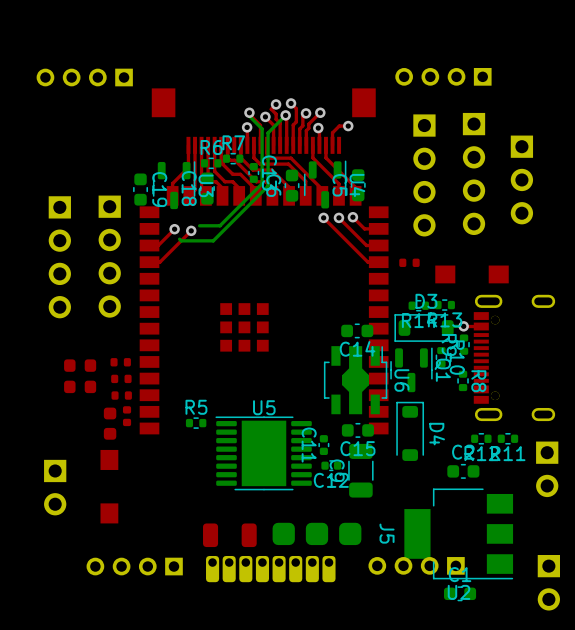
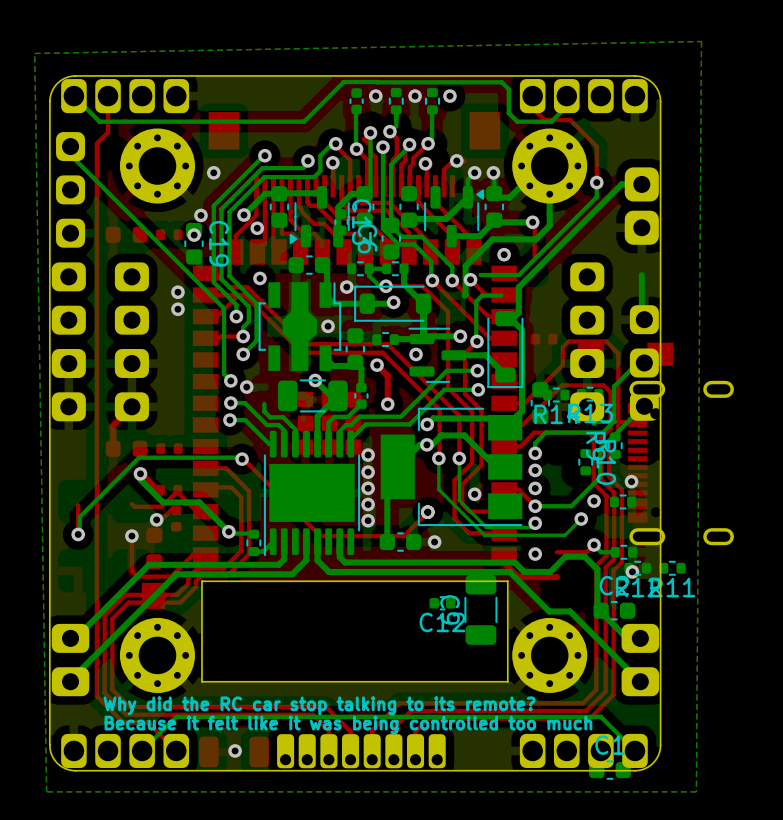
bottom zone outline: none -> (701, 41) (696, 791) (46, 791) (34, 53) (701, 41)
board edge: none -> (634, 75) (75, 75) (62, 79) (55, 85) (49, 101) (49, 745) (51, 754) (59, 765) (75, 770) (634, 770) (644, 768) (655, 760) (660, 745) (660, 101) (658, 91) (653, 83) (644, 77) (634, 75)
part footprint: [395, 67, 492, 86] -> [519, 79, 648, 114]
part footprint: [36, 68, 133, 87] -> [61, 79, 190, 114]
top track: none -> (108, 96) (108, 132) (96, 143) (96, 696) (123, 722) (147, 722) (176, 750)
via: none -> (375, 96)
via: none -> (415, 96)
via: none -> (449, 96)
top track: none -> (532, 96) (532, 108) (544, 119) (570, 119) (596, 146) (596, 182)
bottom track: none -> (566, 96) (566, 106) (551, 121) (517, 121) (508, 113) (508, 89) (501, 82) (343, 81) (304, 121) (99, 121) (73, 96)
part: none -> (356, 101)
part: none -> (396, 101)
part: none -> (432, 101)
bottom track: none -> (356, 109) (355, 143)
bottom track: none -> (432, 109) (432, 144)
bottom track: none -> (370, 138) (370, 188) (364, 194)
bottom track: (249, 112) (249, 116) (262, 128) (262, 183) (219, 225) (199, 225) -> none
bottom track: none -> (70, 146) (70, 154) (224, 308) (224, 374) (230, 380)
bottom track: none -> (333, 145) (330, 145) (320, 155) (320, 170) (314, 177) (264, 177) (229, 211) (229, 276) (256, 303) (256, 341) (243, 354)
bottom track: none -> (412, 146) (409, 146) (391, 164) (391, 226) (401, 236) (421, 236) (452, 267) (452, 276)
bottom track: (285, 115) (268, 132) (268, 186) (213, 240) (181, 240) (179, 239) -> (382, 147) (382, 228) (398, 244) (414, 244) (431, 261) (432, 276)
bottom track: none -> (264, 155) (213, 205) (213, 282) (236, 304) (236, 316)
via: none -> (264, 155)
via: none -> (307, 160)
via: none -> (456, 160)
via: (348, 126) -> none
bottom track: none -> (307, 163) (303, 168) (262, 168) (221, 209) (221, 279) (248, 306) (248, 321) (243, 327) (243, 336)
part: none -> (157, 166)
part: none -> (549, 166)
via: none -> (213, 172)
bottom track: none -> (474, 172) (467, 179) (467, 197) (446, 218) (409, 220)
via: none -> (474, 172)
bottom track: none -> (493, 172) (494, 193) (498, 197) (509, 197) (521, 185) (529, 185)
via: none -> (493, 172)
bottom track: none -> (596, 182) (596, 197) (518, 275) (480, 275)
via: none -> (596, 182)
bottom track: none -> (641, 184) (621, 184) (518, 287) (518, 312) (512, 318) (505, 318)
part: none -> (70, 189)
bottom track: none -> (364, 193) (351, 193) (338, 207) (338, 236)
bottom track: none -> (549, 194) (549, 225) (536, 239) (492, 239) (465, 266) (464, 295)
bottom track: none -> (322, 197) (318, 193) (265, 193) (243, 215)
R7: (233, 158) -> none
part: none -> (641, 206)
part: none -> (279, 206)
part: none -> (364, 206)
part: none -> (409, 206)
part: none -> (494, 206)
R6: (211, 163) -> none
via: none -> (200, 215)
via: none -> (243, 215)
part: none -> (319, 216)
part: none -> (454, 216)
top track: none -> (532, 222) (534, 224) (534, 256)
bottom track: none -> (532, 222) (496, 222) (494, 220) (479, 236) (451, 236)
via: none -> (532, 222)
part: (474, 173) -> none
part: (424, 175) -> none
via: none -> (257, 228)
part: (521, 179) -> none
part: none -> (126, 234)
part: none -> (169, 234)
via: none -> (194, 235)
U4: (325, 184) -> none
U3: (174, 185) -> none
C5: (358, 185) -> none
C18: (207, 188) -> none
via: none -> (504, 254)
part: none -> (309, 265)
bottom track: none -> (322, 265) (327, 269) (327, 293) (325, 295) (334, 303) (393, 302)
part: none -> (360, 268)
bottom track: none -> (386, 268) (369, 268) (369, 275) (379, 286) (386, 286)
part: none -> (395, 268)
bottom track: none -> (404, 268) (404, 284) (423, 303) (423, 337) (394, 339)
top track: none -> (205, 273) (215, 273) (229, 287) (247, 287) (304, 344) (387, 344) (459, 415) (459, 458)
bottom track: none -> (641, 275) (641, 315) (638, 318)
via: none -> (259, 278)
via: none -> (346, 287)
top track: none -> (386, 286) (422, 286) (448, 311) (448, 387) (472, 412) (472, 463) (454, 480) (454, 518) (469, 533) (504, 533)
via: none -> (386, 286)
via: none -> (177, 292)
top track: none -> (205, 294) (244, 294) (302, 352) (382, 352) (439, 409) (438, 458)
via: (174, 229) -> none
bottom track: none -> (501, 295) (482, 295) (476, 301) (477, 341)
top track: (191, 230) (161, 260) -> (243, 336) (221, 336)
via: (191, 230) -> none
via: none -> (393, 302)
part: none -> (392, 303)
via: none -> (177, 309)
via: none -> (236, 316)
bottom track: none -> (510, 318) (522, 330) (522, 410) (505, 427) (495, 418) (433, 418) (427, 424)
via: none -> (328, 326)
part: none -> (299, 326)
part: (109, 256) -> none
part: (59, 257) -> none
via: none -> (243, 336)
bottom track: none -> (460, 336) (423, 336)
via: none -> (460, 336)
part: none -> (385, 339)
part: none -> (68, 341)
part: none -> (131, 341)
top track: none -> (477, 341) (465, 353) (465, 394) (481, 410) (481, 465) (462, 484) (462, 504) (469, 511) (504, 511)
via: none -> (477, 341)
part: none -> (587, 341)
part: none -> (355, 349)
part: none -> (505, 349)
via: none -> (243, 354)
via: none -> (416, 354)
part: none -> (437, 355)
bottom track: none -> (454, 355) (485, 355) (505, 374)
bottom track: none -> (325, 358) (333, 365) (351, 365) (355, 362) (361, 368) (361, 387)
bottom track: none -> (638, 362) (614, 386) (614, 421) (602, 432) (545, 432) (535, 443) (535, 453)
part: none -> (644, 362)
top track: none -> (377, 365) (387, 375) (387, 404)
via: none -> (377, 365)
bottom track: none -> (477, 370) (446, 370) (401, 416) (359, 416) (351, 425) (346, 425) (339, 431) (339, 444)
via: none -> (477, 370)
via: none -> (230, 380)
bottom track: none -> (315, 380) (330, 395) (338, 395) (317, 416) (317, 444)
via: none -> (315, 380)
via: none -> (246, 387)
bottom track: none -> (478, 389) (444, 389) (409, 424) (365, 424) (350, 439) (350, 444)
via: none -> (478, 389)
part: none -> (312, 395)
part: none -> (361, 395)
bottom track: none -> (230, 403) (244, 403) (267, 425) (278, 425) (284, 430) (284, 444)
via: none -> (230, 403)
part: none -> (540, 403)
bottom track: none -> (264, 404) (264, 411) (270, 417) (283, 417) (295, 429) (295, 444)
bottom track: none -> (361, 404) (348, 416) (334, 416) (328, 422) (328, 444)
via: none -> (387, 404)
top track: none -> (504, 403) (524, 403) (562, 365) (562, 347) (568, 341) (606, 341) (618, 353) (618, 432) (609, 441) (609, 476) (621, 489) (621, 562) (613, 570) (613, 694) (589, 718) (428, 718) (415, 731) (415, 759)
bottom track: none -> (638, 405) (638, 411) (600, 449) (600, 477) (571, 506) (535, 506)
top track: none -> (131, 406) (113, 425) (113, 448)
bottom track: none -> (229, 420) (245, 420) (269, 444) (273, 444)
via: none -> (229, 420)
via: (463, 326) -> none
via: none -> (427, 424)
D3: (424, 328) -> none
C14: (357, 330) -> none
top track: none -> (505, 426) (504, 424) (522, 424) (562, 385) (603, 385) (610, 392) (610, 428) (601, 437) (601, 480) (614, 492) (614, 558) (605, 567) (605, 691) (586, 710) (411, 710) (393, 728) (393, 759)
via: none -> (426, 444)
top track: none -> (504, 446) (520, 446) (534, 432) (588, 432) (593, 437) (593, 483) (606, 495) (606, 555) (596, 565) (596, 689) (582, 703) (399, 703) (372, 730) (372, 759)
part: none -> (126, 448)
via: none -> (535, 453)
via: none -> (368, 455)
top track: none -> (242, 459) (320, 536) (403, 536) (427, 512)
bottom track: none -> (242, 459) (139, 457) (79, 517) (78, 534)
via: none -> (242, 459)
via: none -> (438, 458)
bottom track: none -> (459, 458) (459, 500) (486, 527) (530, 527) (535, 523)
via: none -> (459, 458)
bottom track: none -> (442, 459) (438, 463) (438, 489) (484, 535) (565, 535) (581, 519)
part: none -> (451, 466)
bottom track: none -> (505, 466) (495, 466) (464, 435) (441, 435) (432, 444) (419, 444) (387, 477) (387, 542)
top track: none -> (205, 468) (226, 468) (248, 491) (248, 554) (226, 576) (200, 576) (195, 581) (195, 587) (180, 602) (128, 602) (112, 618) (112, 689) (129, 706) (326, 706) (350, 731) (350, 759)
part position: (120, 362) -> (169, 448)
via: none -> (535, 470)
via: none -> (368, 472)
part: (80, 365) -> none
top track: none -> (140, 473) (159, 491)
bottom track: none -> (140, 473) (140, 479) (163, 502) (199, 502) (230, 533) (253, 534)
via: none -> (140, 473)
Q1: (411, 369) -> none
via: none -> (631, 481)
via: none -> (368, 488)
via: none -> (535, 488)
top track: none -> (205, 489) (208, 487) (231, 487) (241, 497) (241, 550) (223, 568) (197, 568) (188, 577) (188, 583) (177, 594) (125, 594) (104, 615) (104, 692) (126, 714) (312, 714) (328, 730) (328, 759)
top track: none -> (504, 489) (518, 489) (535, 506)
U6: (355, 380) -> none
R8: (463, 380) -> none
part: none -> (312, 493)
via: none -> (474, 494)
part: (80, 386) -> none
via: none -> (594, 501)
part: none -> (623, 501)
top track: none -> (131, 504) (134, 506) (161, 506) (176, 491) (196, 511) (205, 511)
via: none -> (368, 504)
top track: none -> (78, 505) (78, 534)
part footprint: [111, 391, 132, 400] -> [170, 505, 182, 532]
via: none -> (535, 506)
top track: none -> (176, 510) (170, 510) (161, 519) (156, 519)
via: none -> (427, 512)
via: none -> (581, 519)
via: none -> (156, 519)
via: none -> (368, 520)
via: none -> (535, 523)
via: none -> (228, 531)
via: none -> (78, 534)
top track: none -> (131, 536) (131, 570) (137, 576) (171, 576) (192, 554) (205, 554)
via: none -> (131, 536)
part: (127, 416) -> none
bottom track: none -> (273, 541) (263, 551) (253, 551)
bottom track: none -> (284, 541) (284, 559) (278, 564) (149, 564) (75, 638)
bottom track: none -> (306, 541) (306, 560) (292, 574) (176, 574) (75, 675) (75, 681)
bottom track: none -> (317, 541) (317, 560) (328, 571) (509, 571) (549, 611) (570, 611) (640, 681)
bottom track: none -> (339, 541) (339, 557) (345, 562) (514, 562) (524, 571) (550, 571) (565, 556) (584, 556) (597, 569) (597, 608) (627, 638) (640, 638)
part: none -> (400, 542)
via: none -> (434, 542)
part: none -> (253, 542)
top track: none -> (594, 544) (586, 552) (557, 552)
bottom track: none -> (594, 544) (601, 552) (615, 552)
via: none -> (594, 544)
R5: (196, 423) -> none
part: none -> (623, 552)
via: none -> (535, 554)
top track: none -> (504, 554) (504, 562) (518, 577) (557, 577)
C15: (357, 430) -> none
D4: (410, 431) -> none
via: none -> (632, 571)
C11: (323, 445) -> none
board edge: none -> (507, 581) (201, 581) (201, 681) (507, 681) (507, 581)
U5: (263, 453) -> none
part: (547, 469) -> none
part: (55, 487) -> none
part: none -> (157, 655)
part: none -> (549, 655)
part: none -> (70, 660)
part: none -> (640, 660)
J5: (316, 533) -> none
U2: (458, 533) -> none
part position: (229, 535) -> (234, 751)
text: none -> Why did the RC car stop talking to its remote? (319, 705)
text: none -> Because it felt like it was being controlled too much (348, 725)
part: (416, 565) -> none
part: (134, 566) -> none
part rotation: 0° (270, 569) -> 180° (361, 751)
part: none -> (125, 750)
via: none -> (235, 750)
part: none -> (583, 750)
bottom track: none -> (634, 750) (600, 716) (176, 716) (142, 750)
part: (548, 582) -> none

